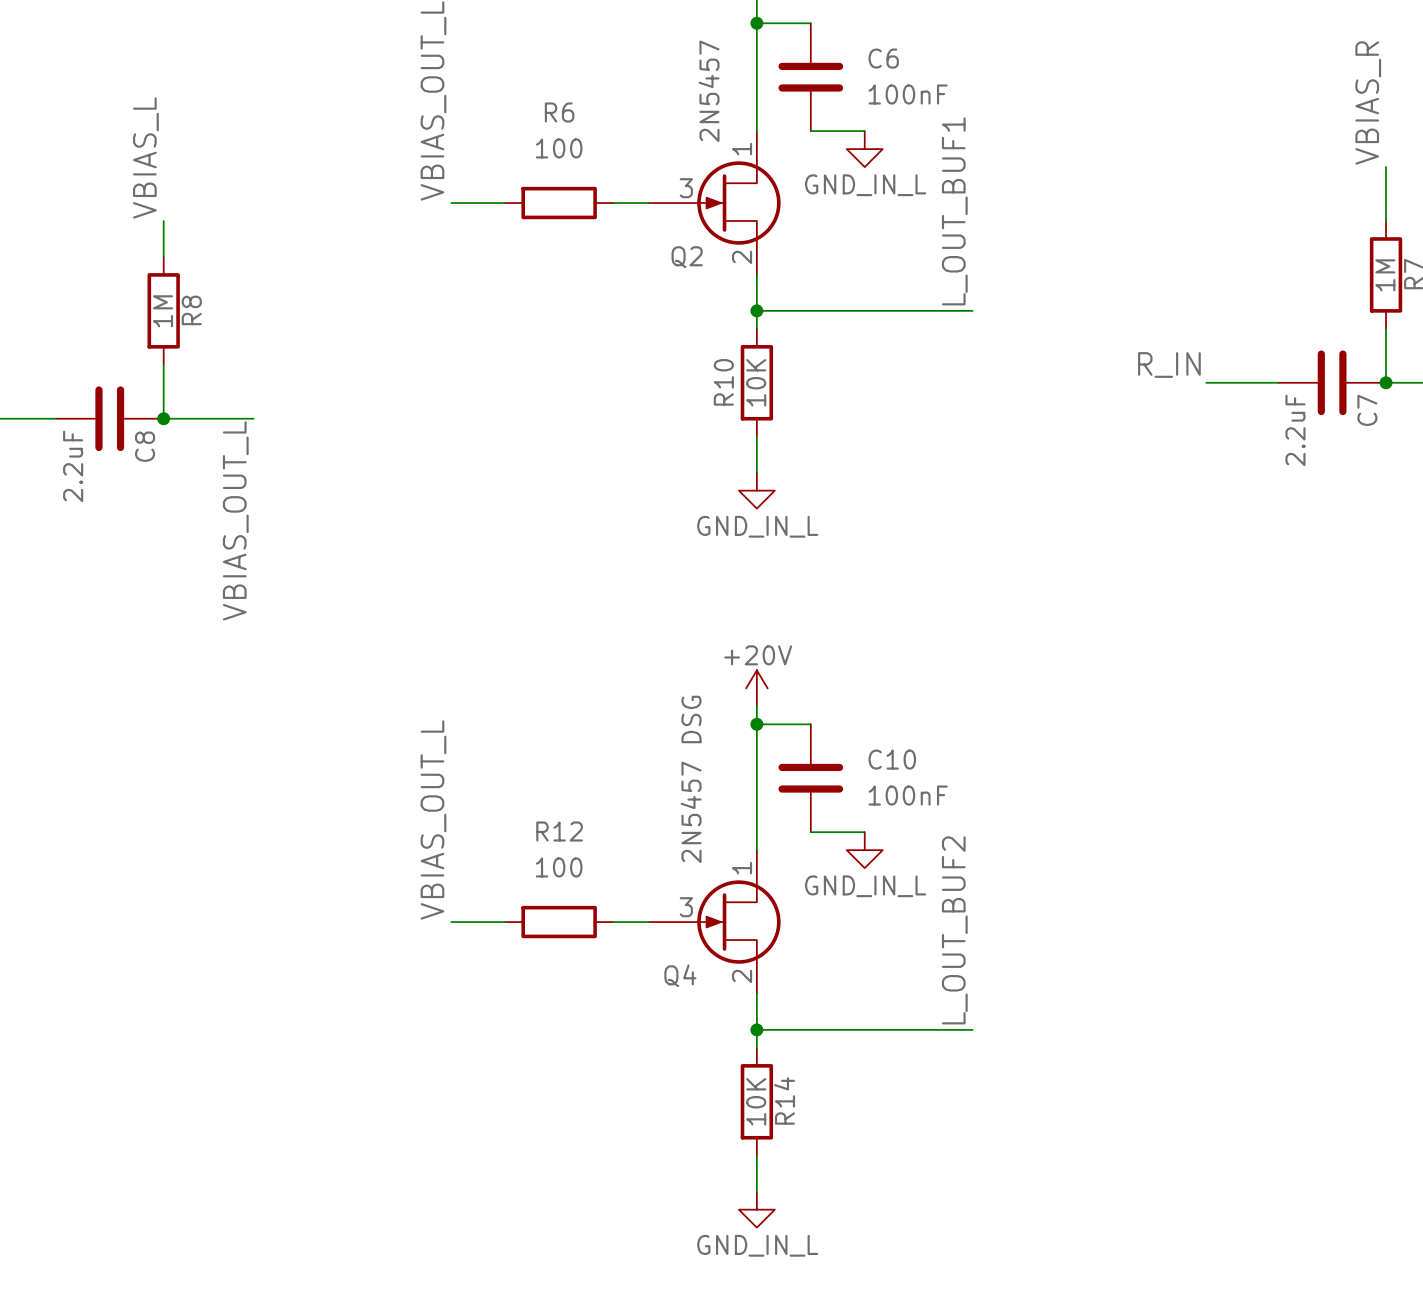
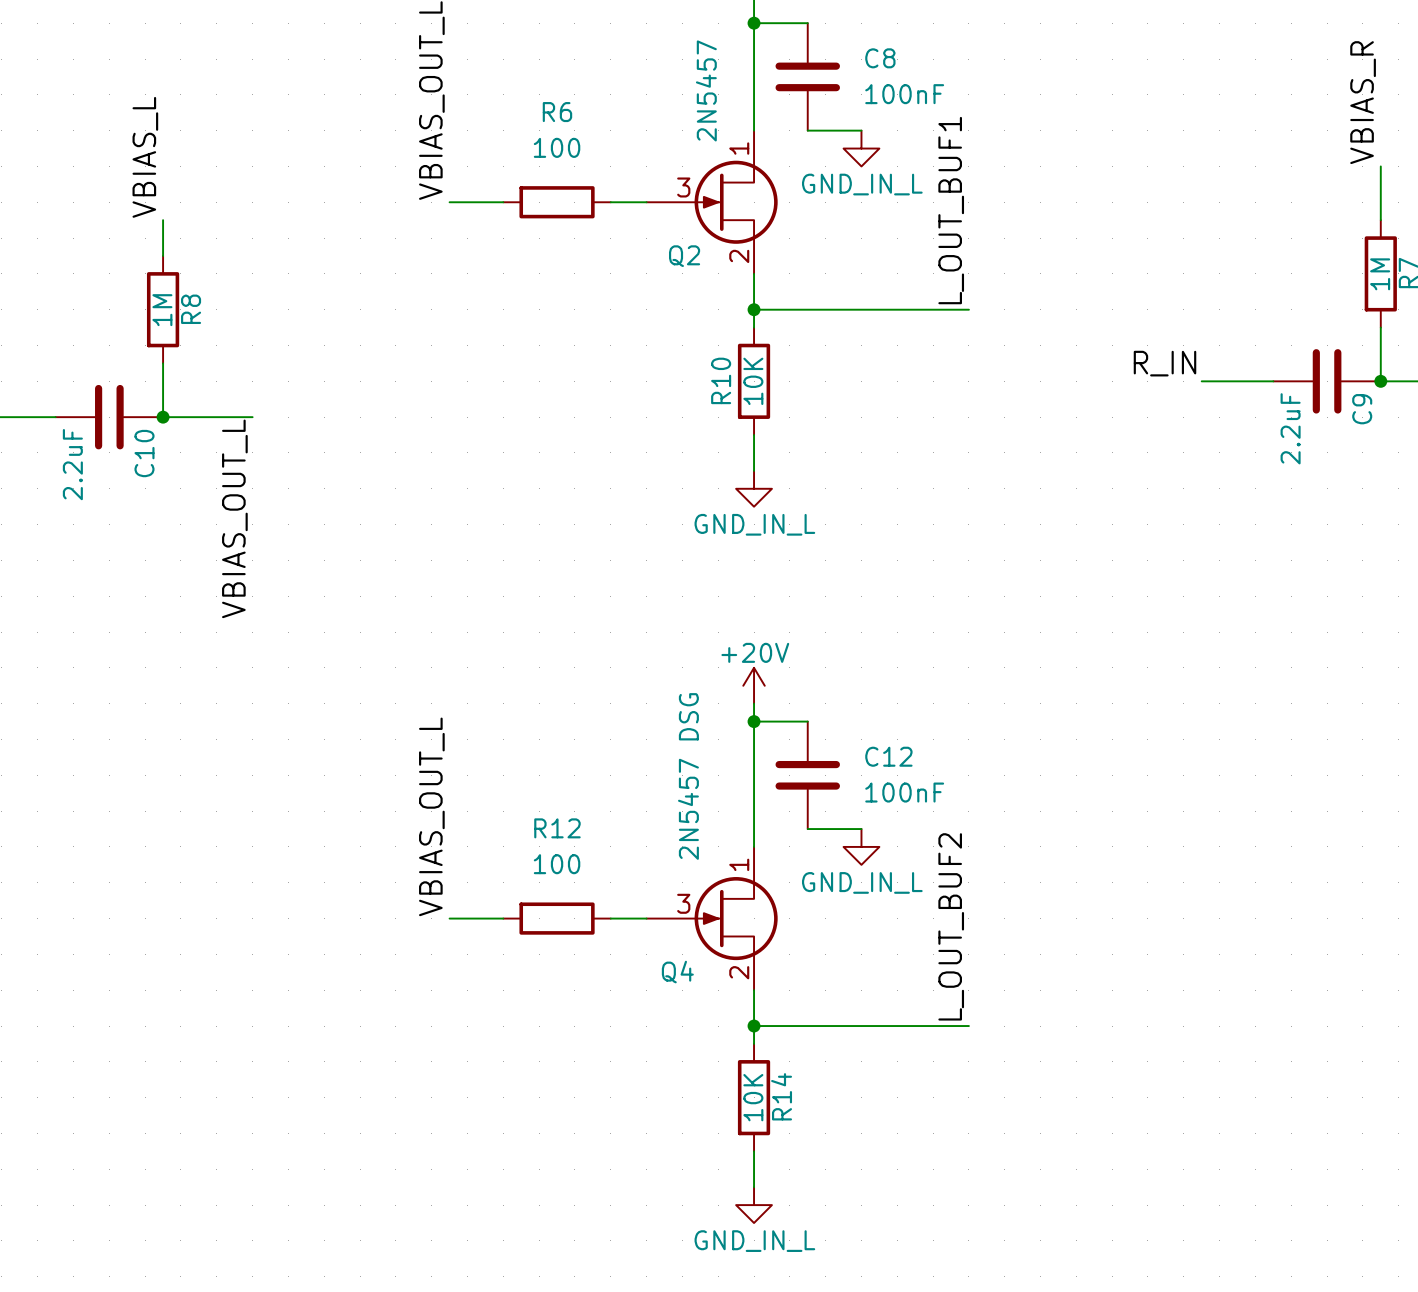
C6 name: C6 (883, 58) -> C8 (880, 58)
C7 name: C7 (1367, 410) -> C9 (1362, 409)
C8 name: C8 (145, 446) -> C10 (144, 453)
C10 name: C10 (892, 759) -> C12 (888, 756)

